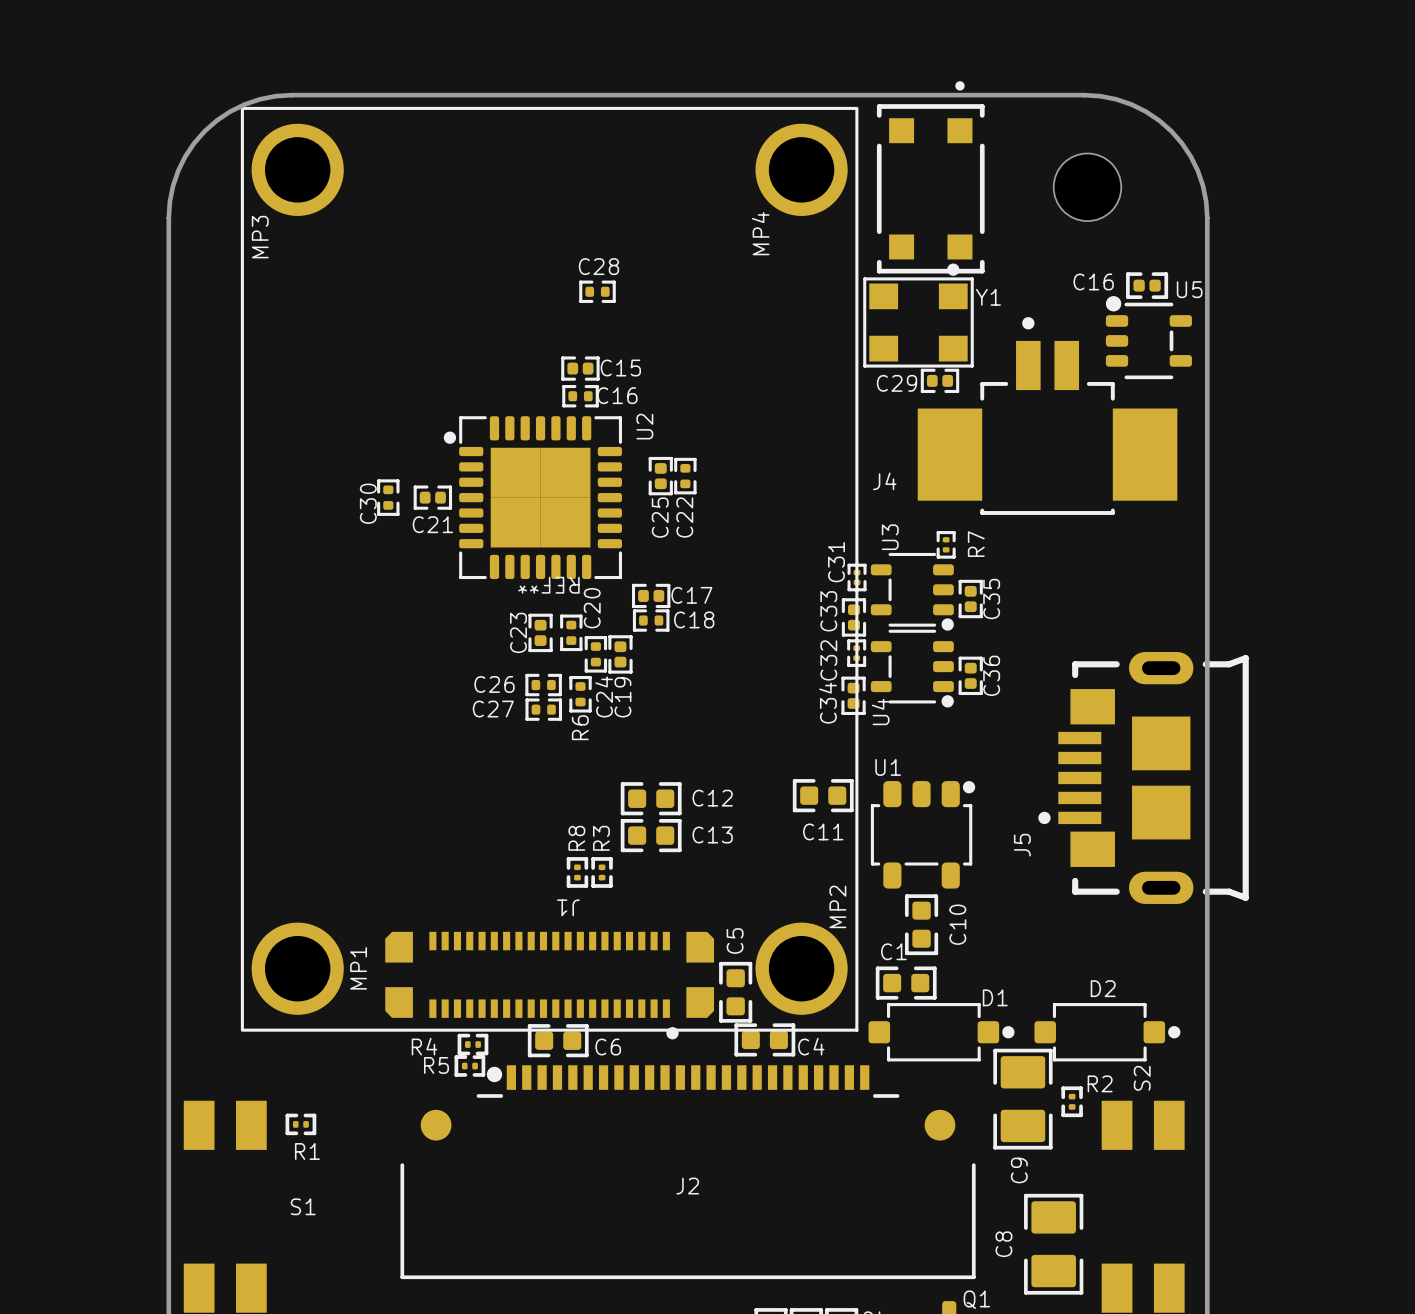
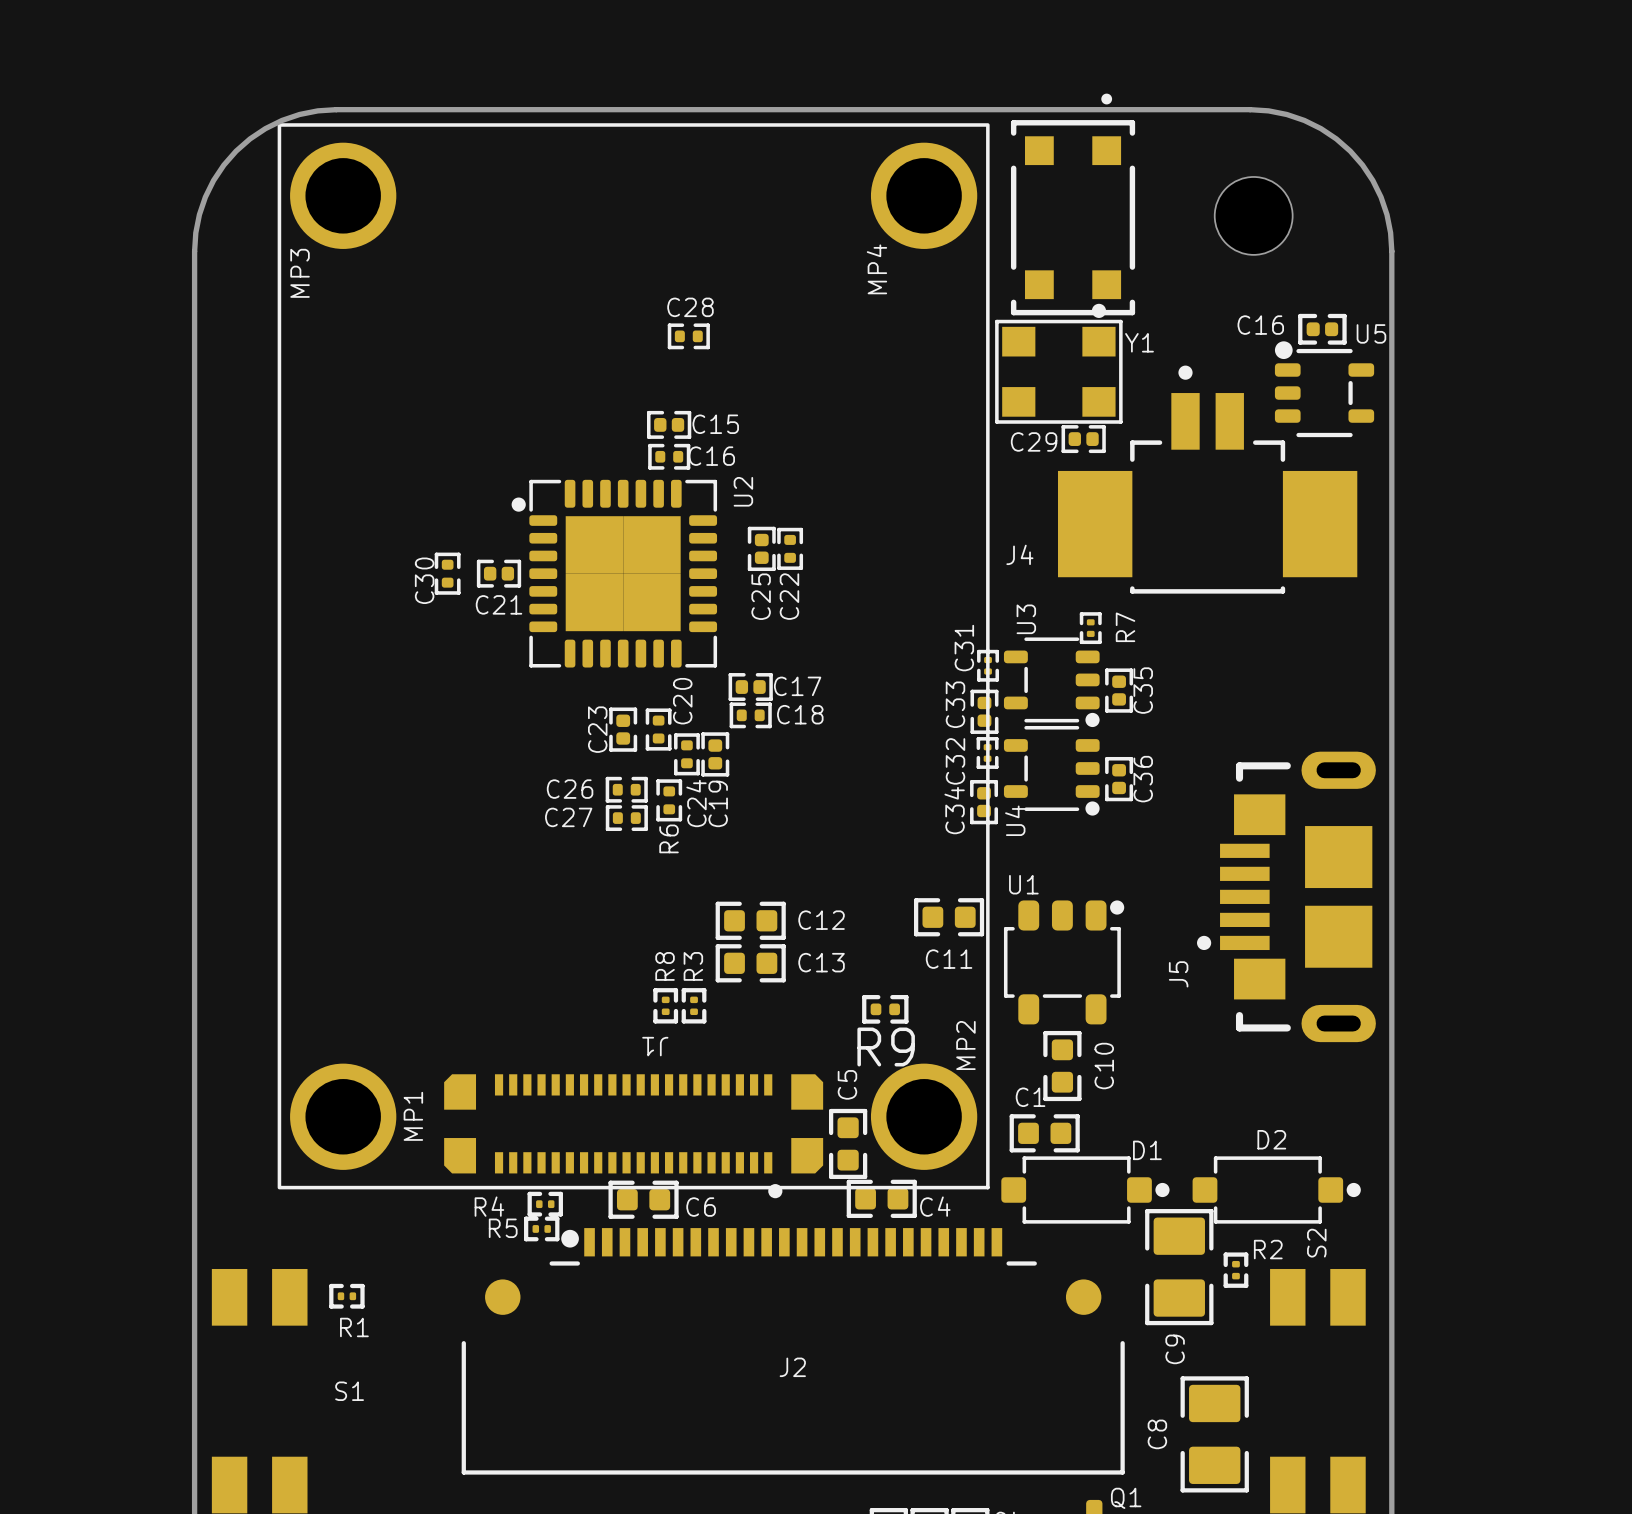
REF**: (549, 569) -> none
J5 footprint: [1038, 652, 1249, 904] -> [1197, 751, 1376, 1043]
R9: none -> (885, 1009)

